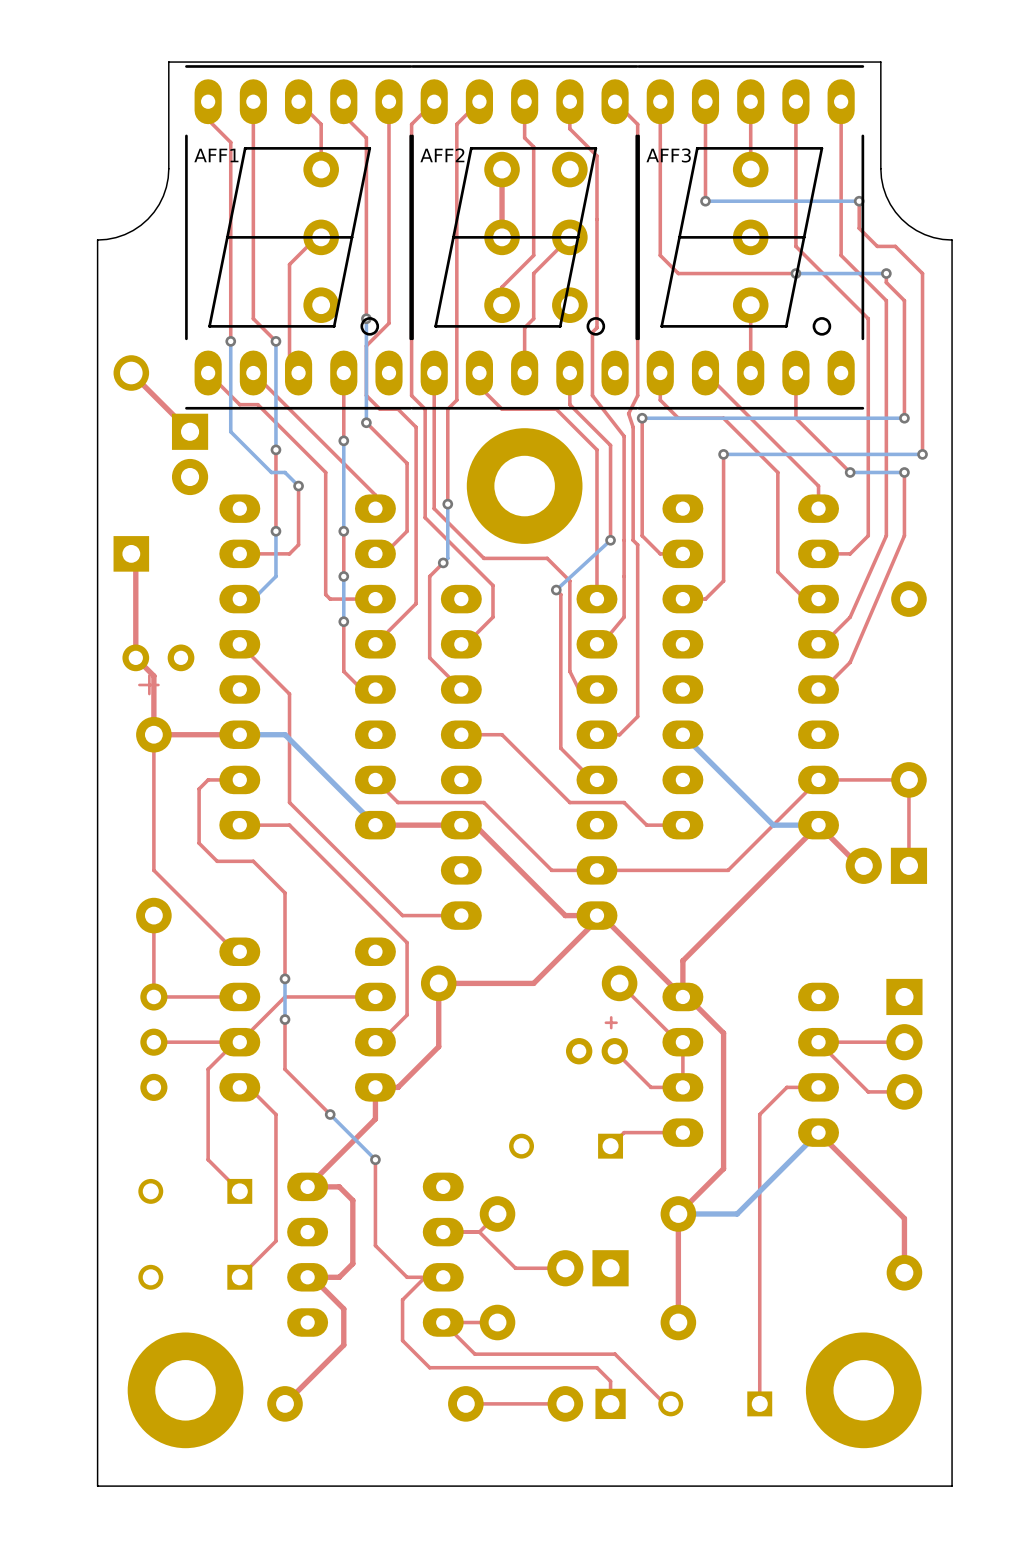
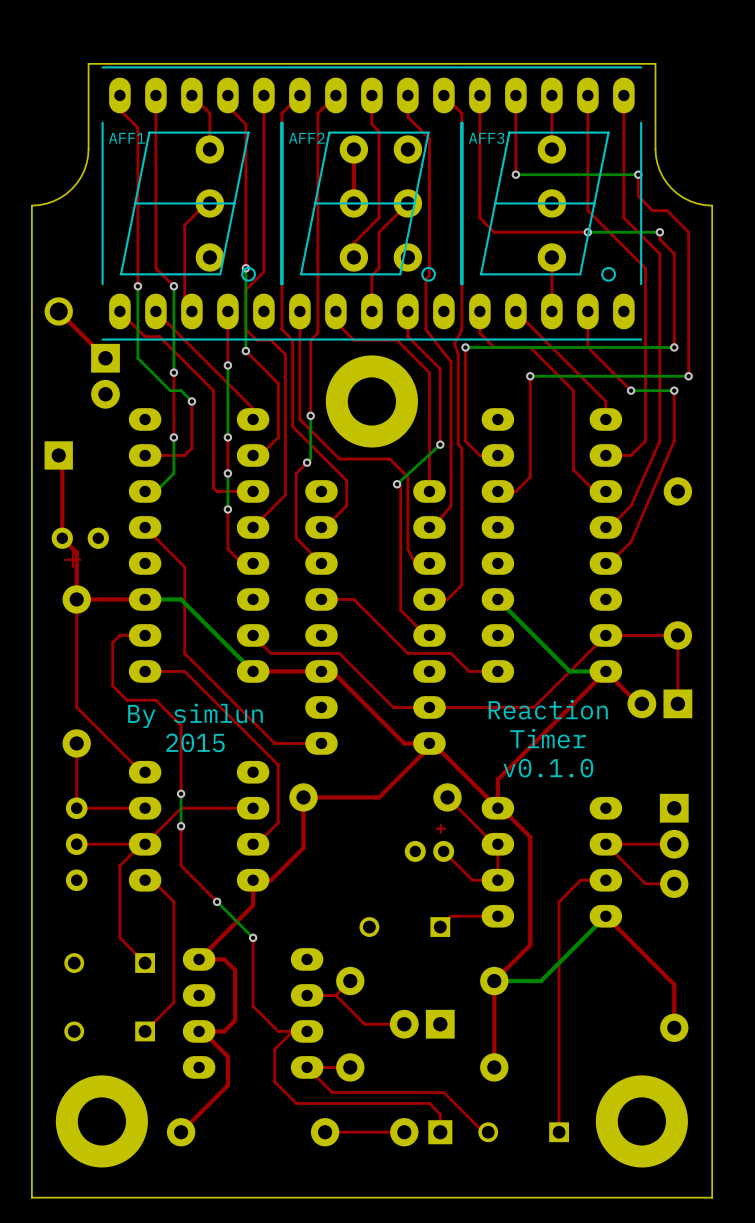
text: none -> Reaction (548, 709)
text: none -> By simlun (195, 715)
text: none -> Timer (548, 738)
text: none -> 2015 (195, 742)
text: none -> v0.1.0 (548, 768)

